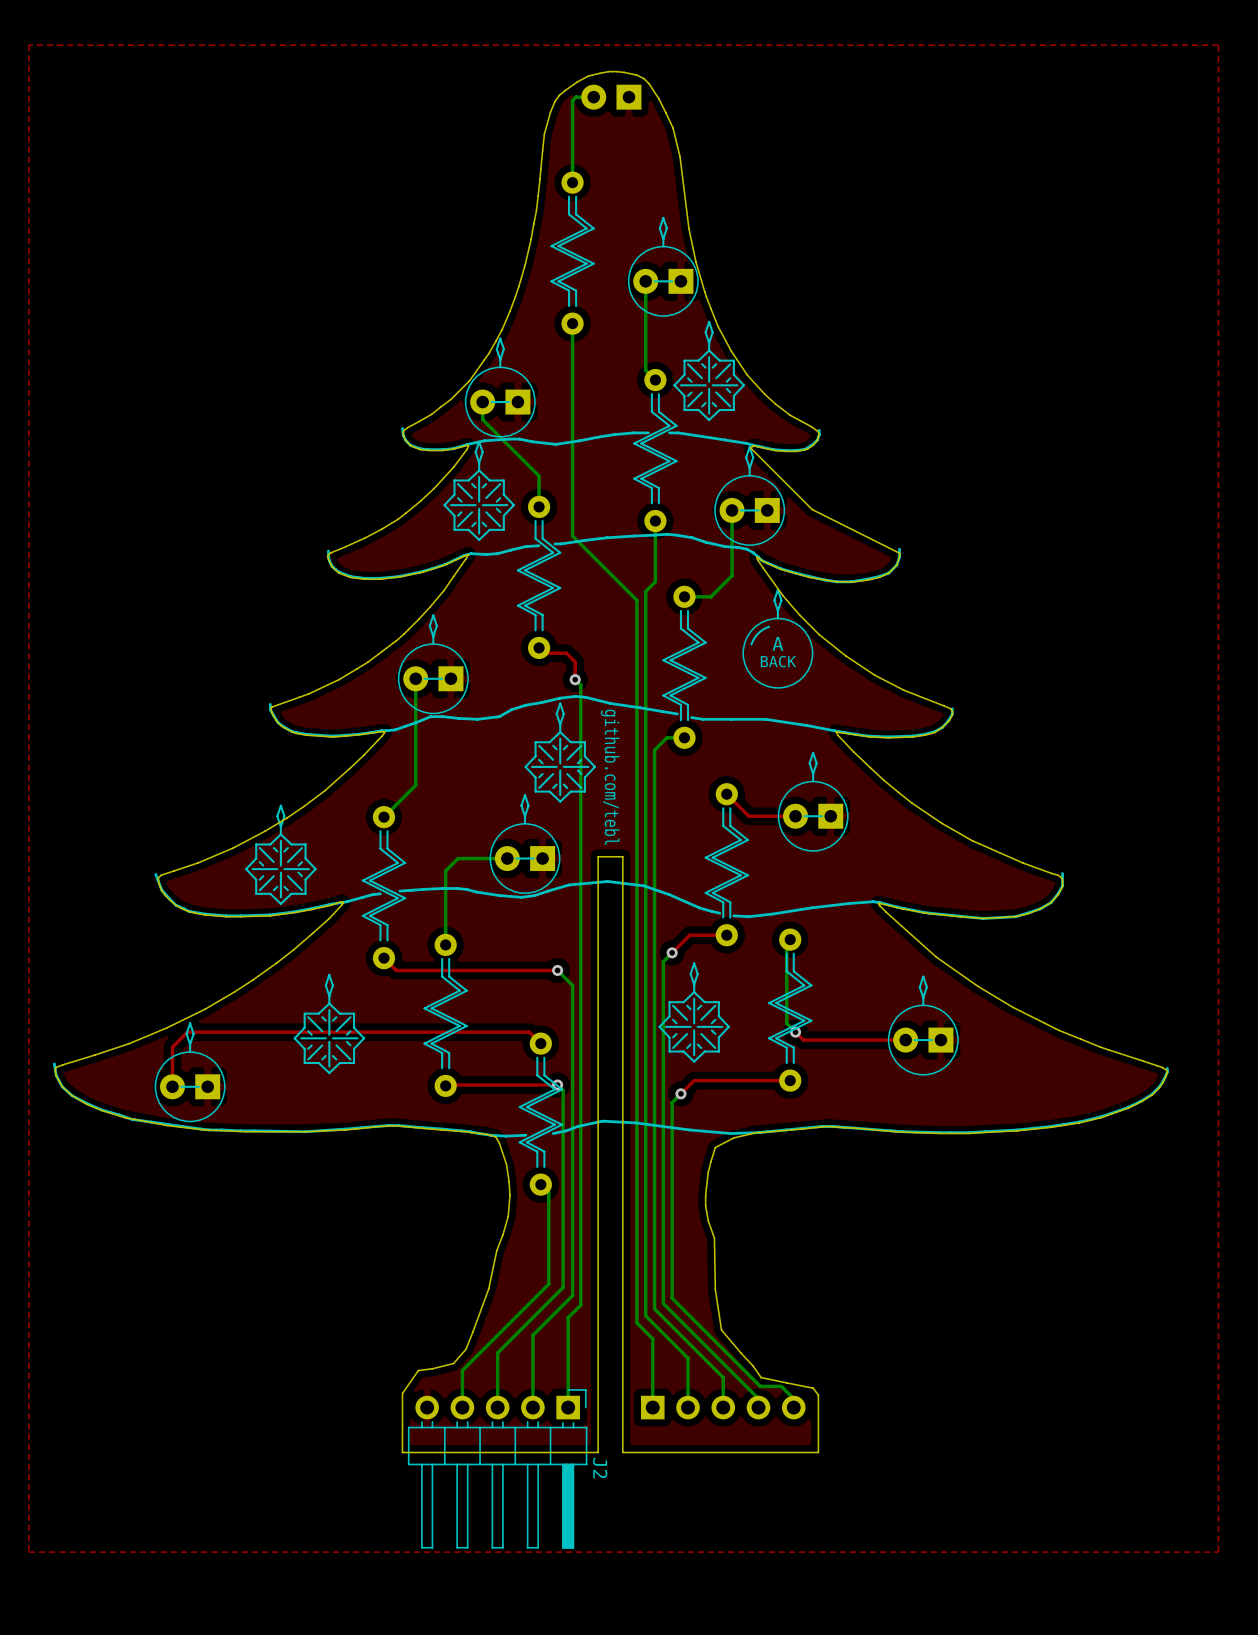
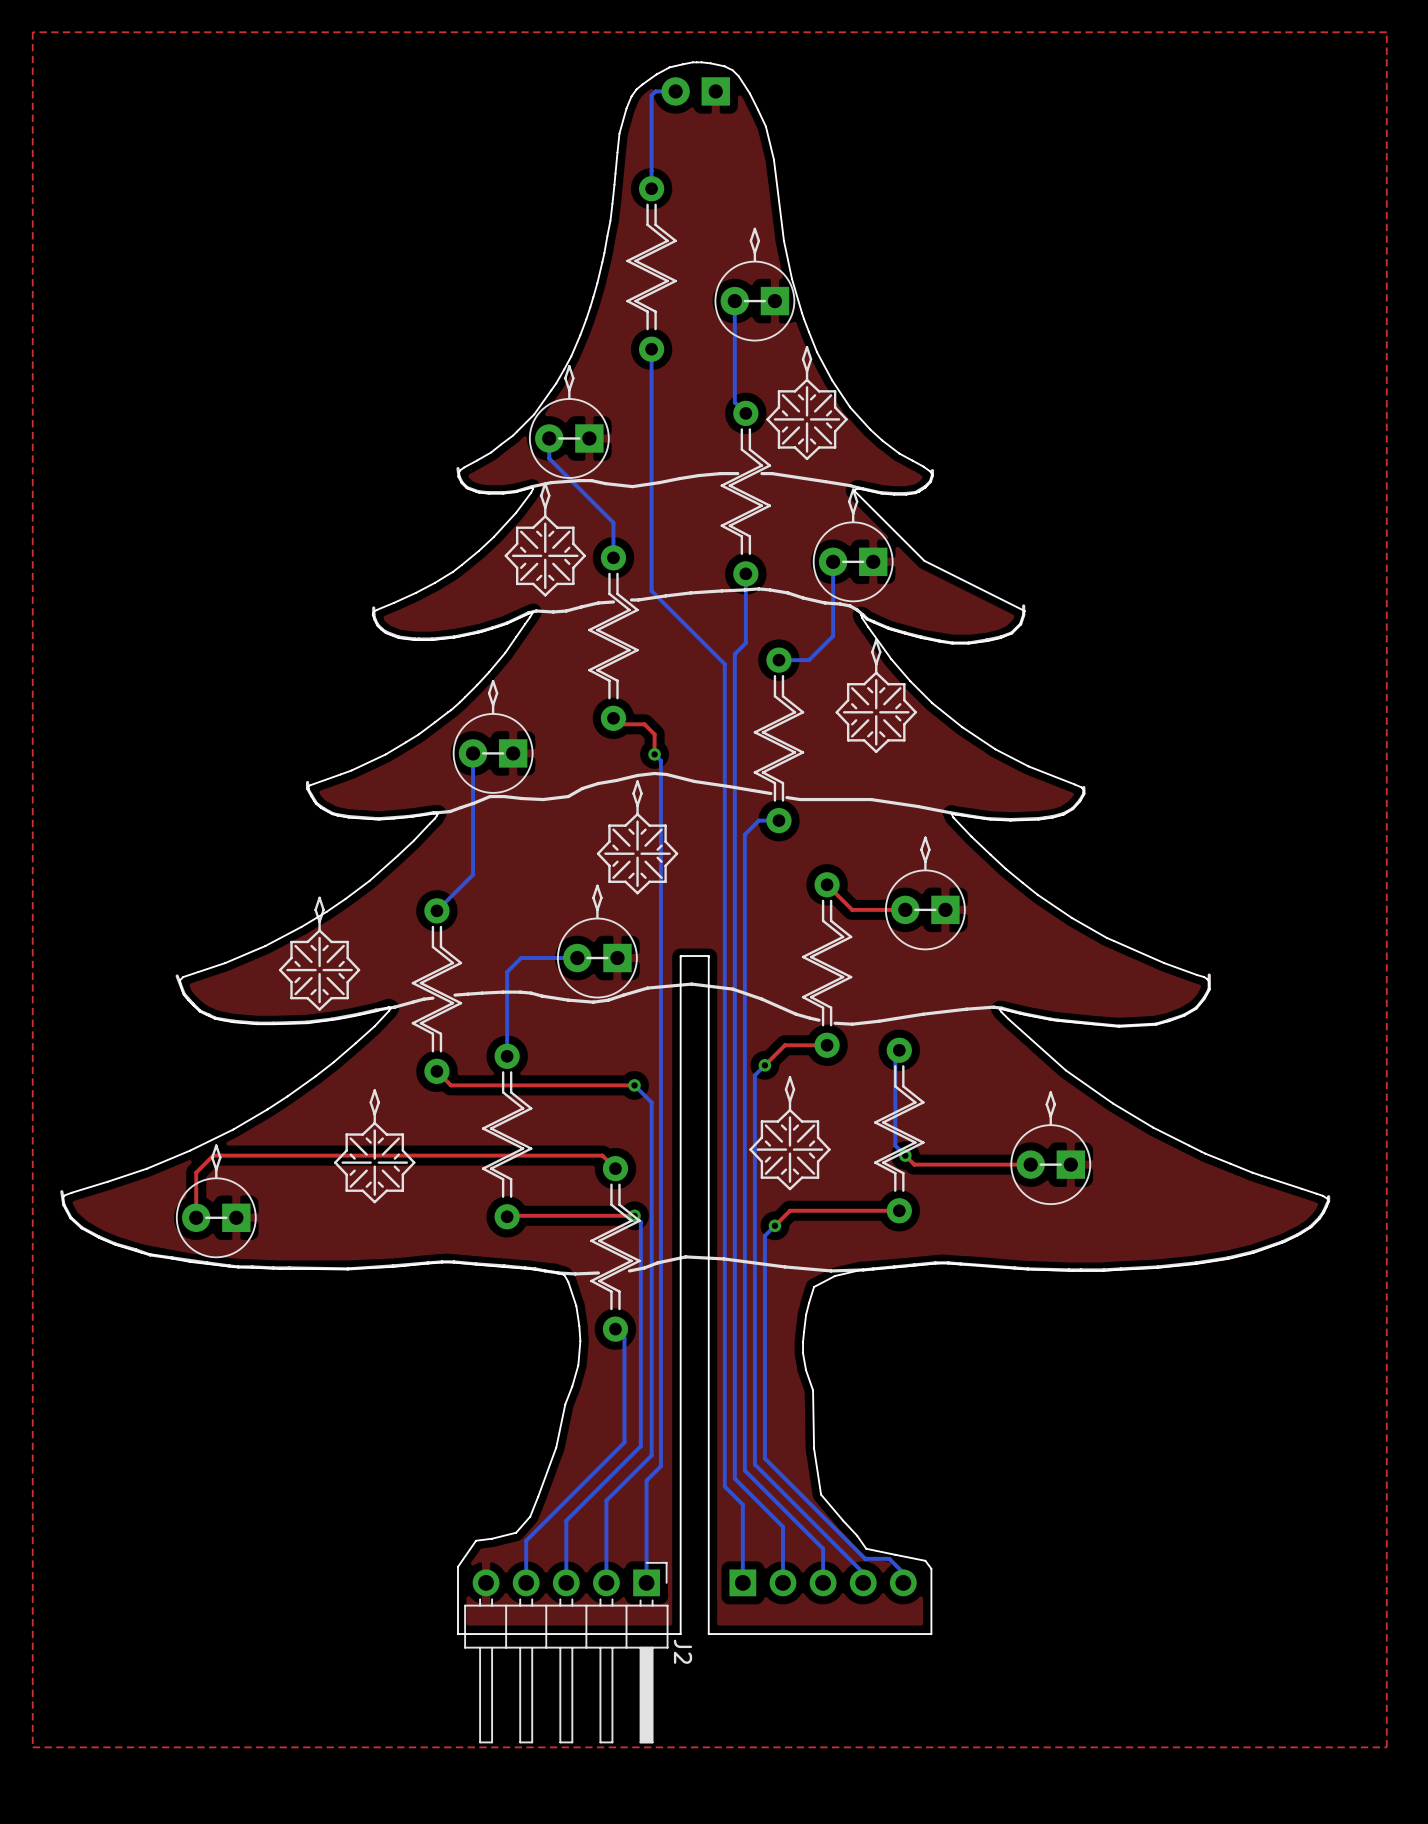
drawing shape: [742, 588, 814, 689] -> [835, 638, 917, 753]
text: github.com/tebl (610, 777) -> none

